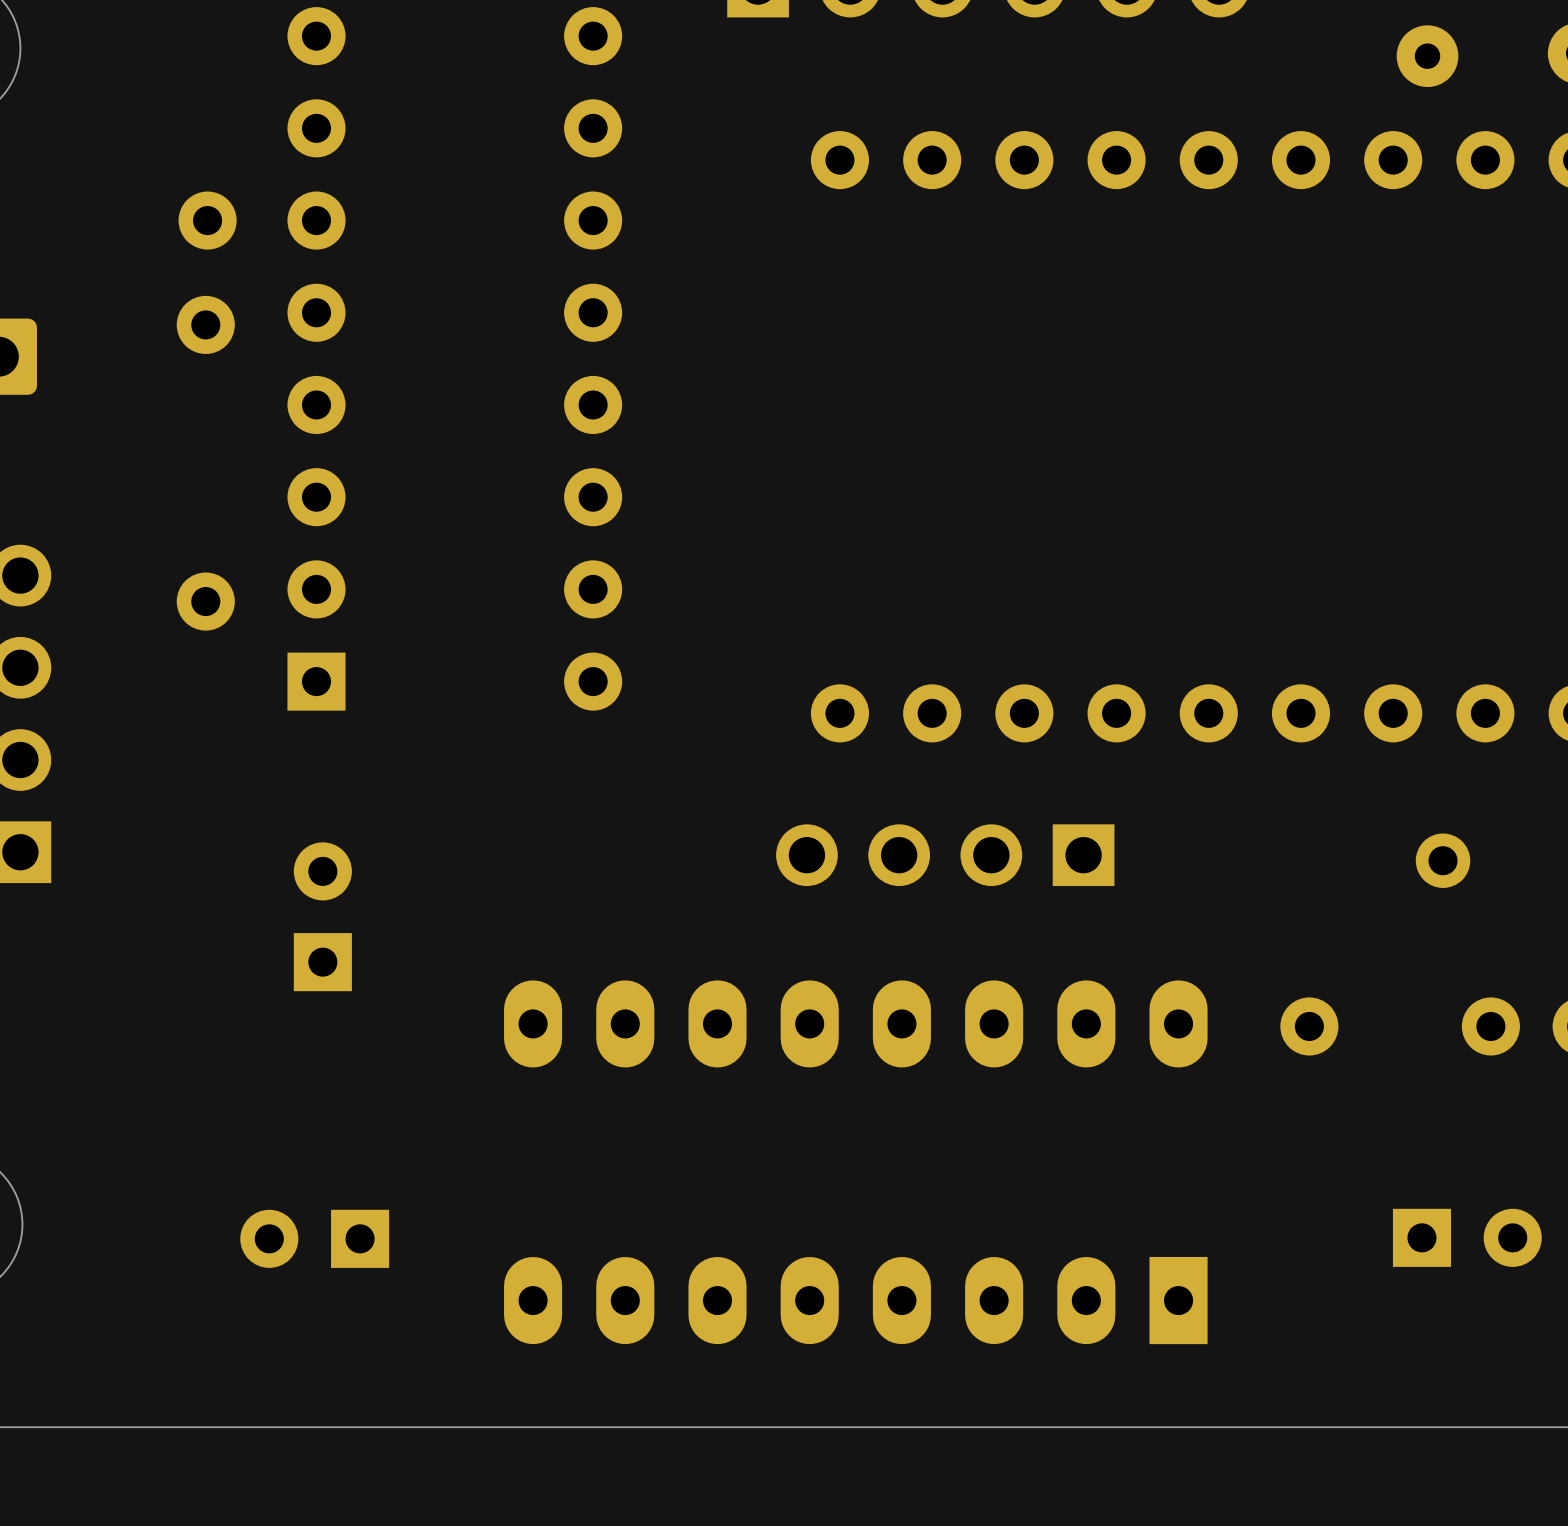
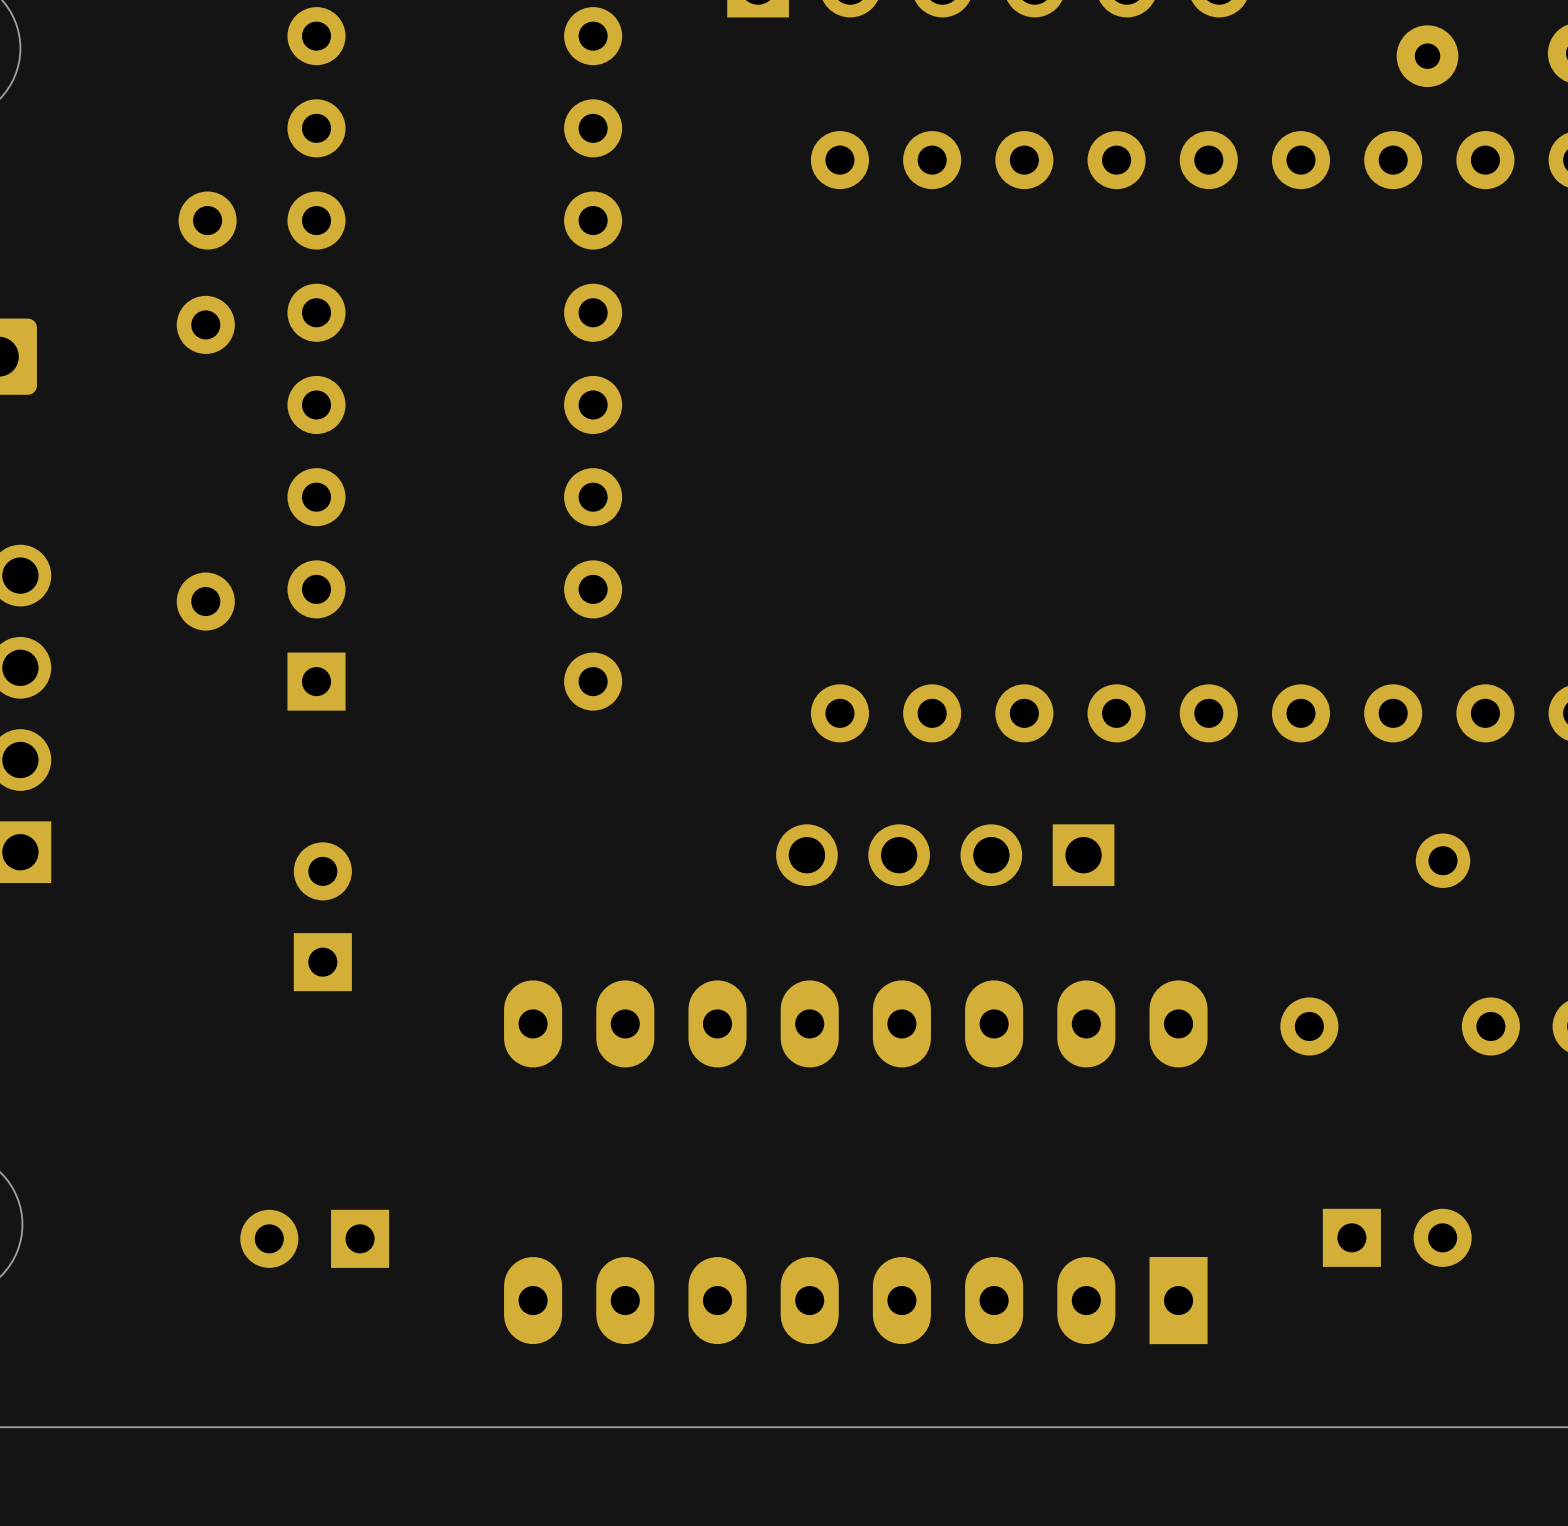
part position: (1467, 1237) -> (1397, 1237)

